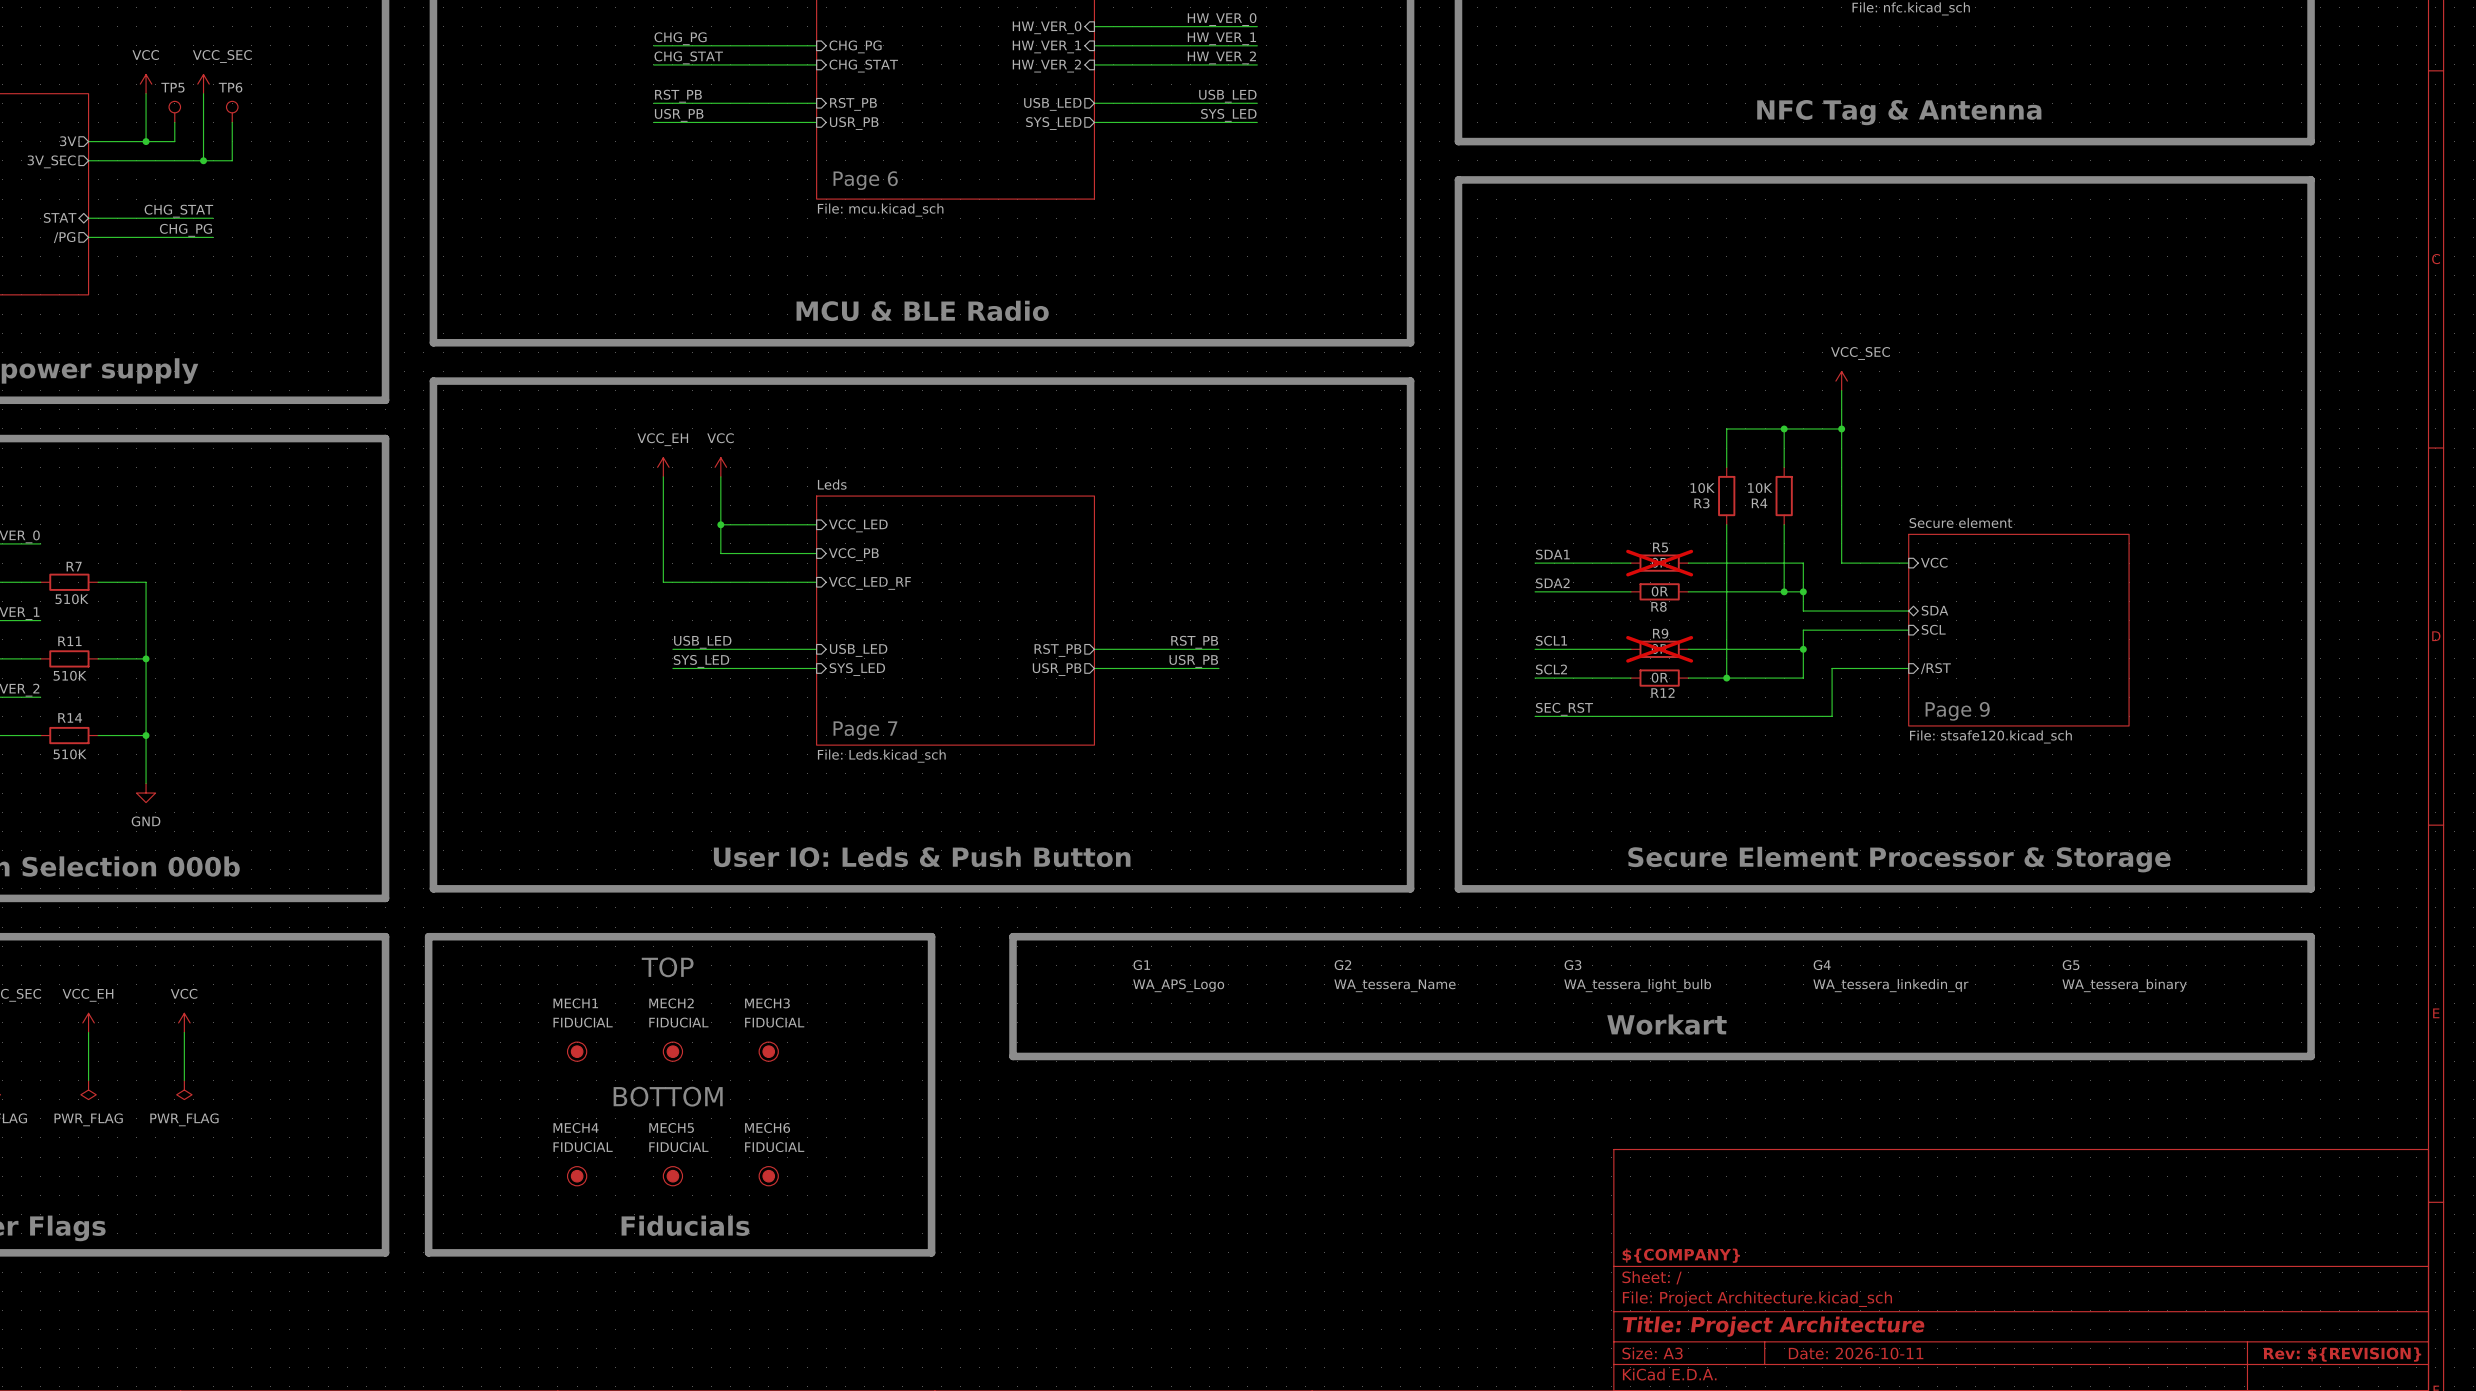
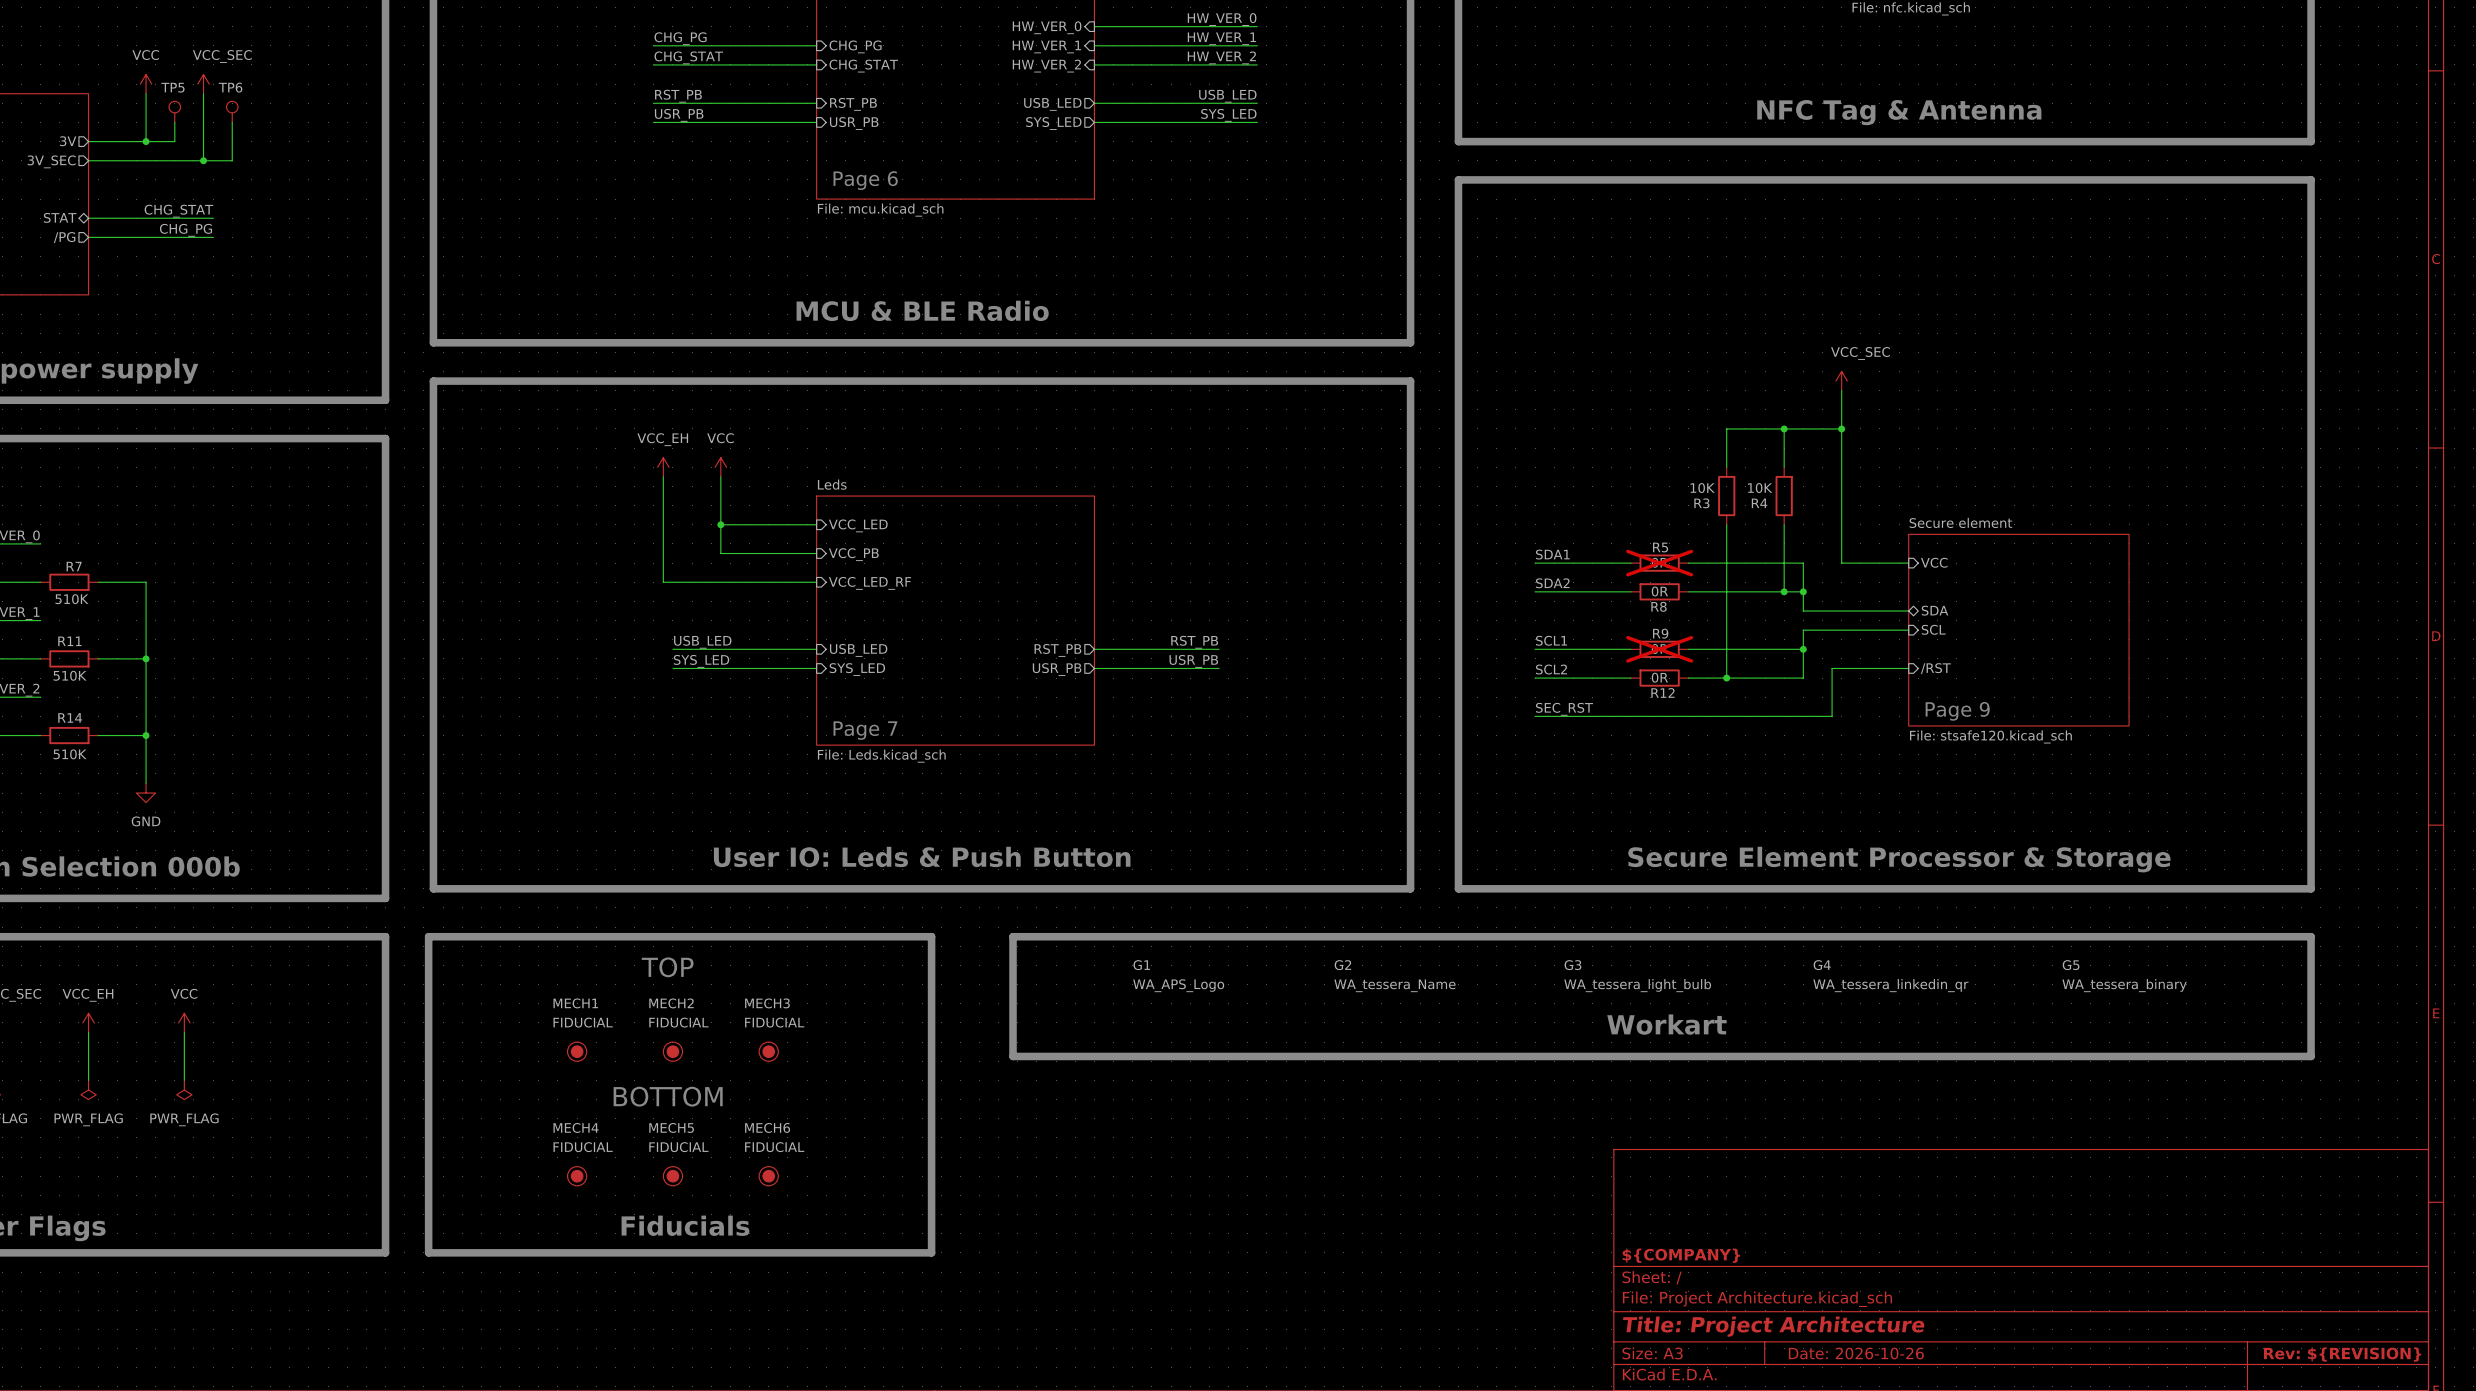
title block: Date: 2026-10-11 (1856, 1353) -> Date: 2026-10-26 (1856, 1353)

